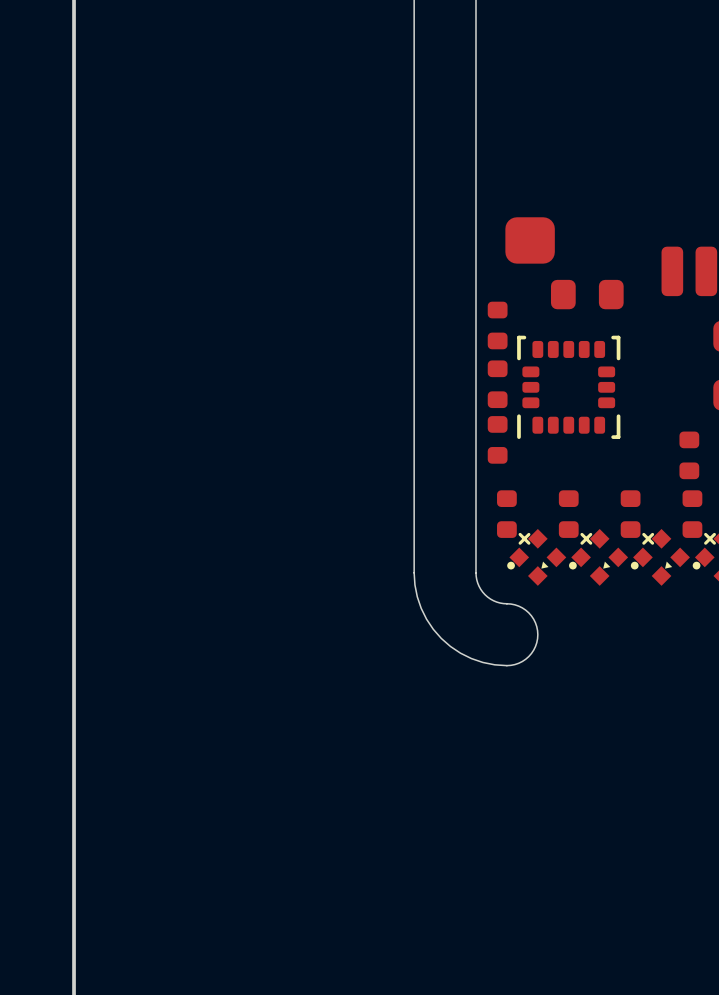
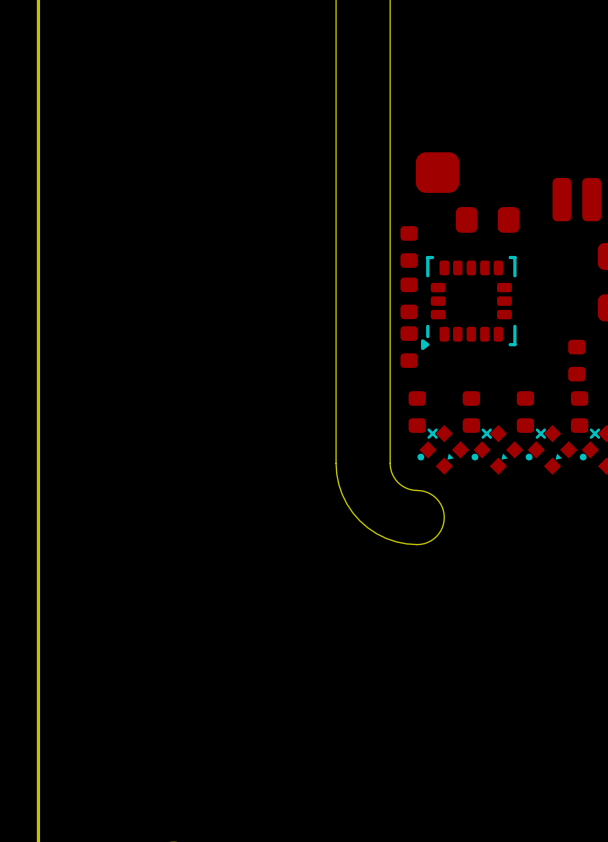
part footprint: [517, 335, 621, 439] -> [421, 255, 517, 351]

